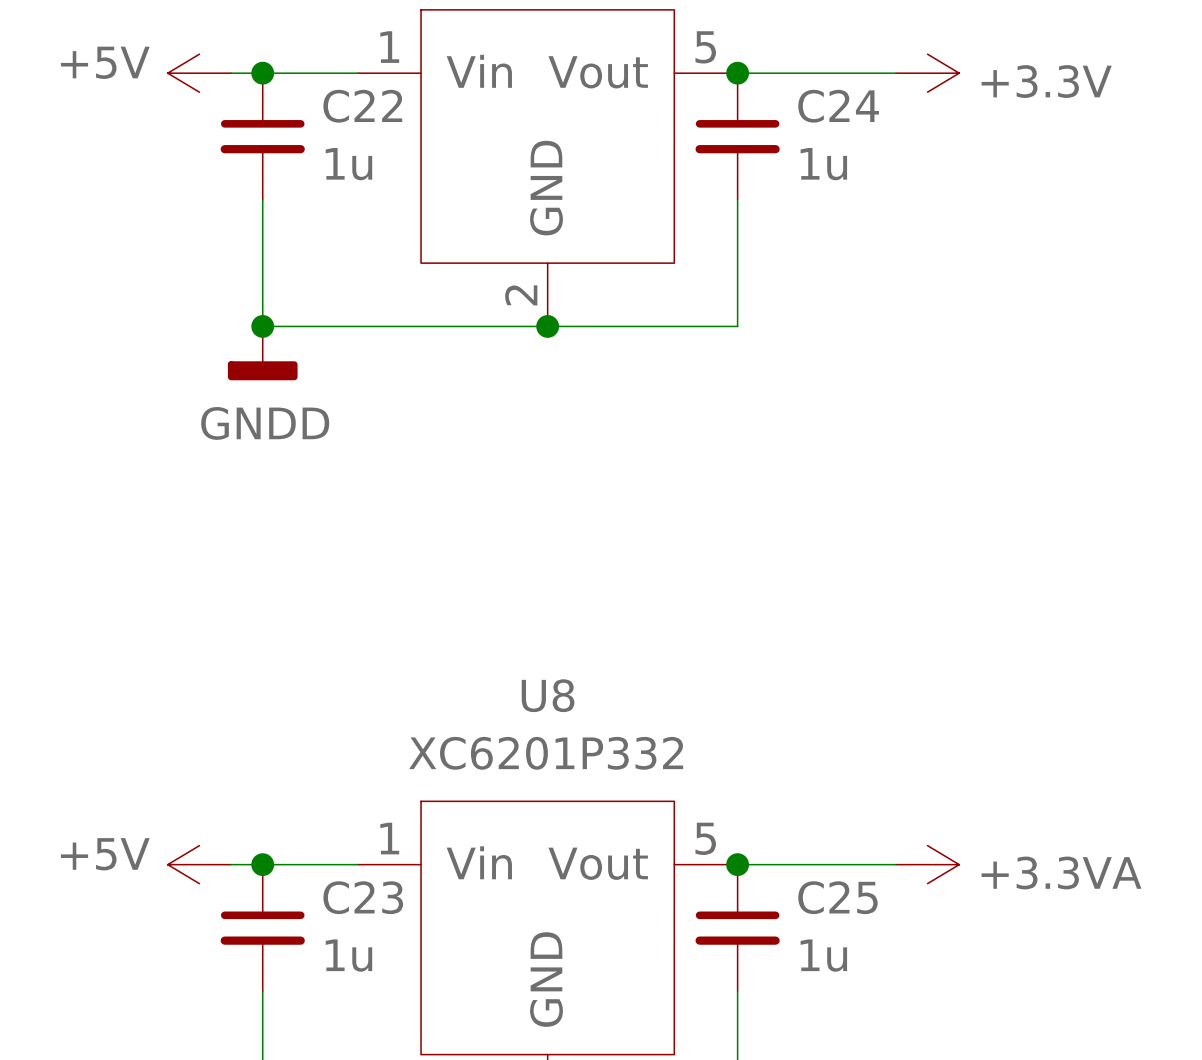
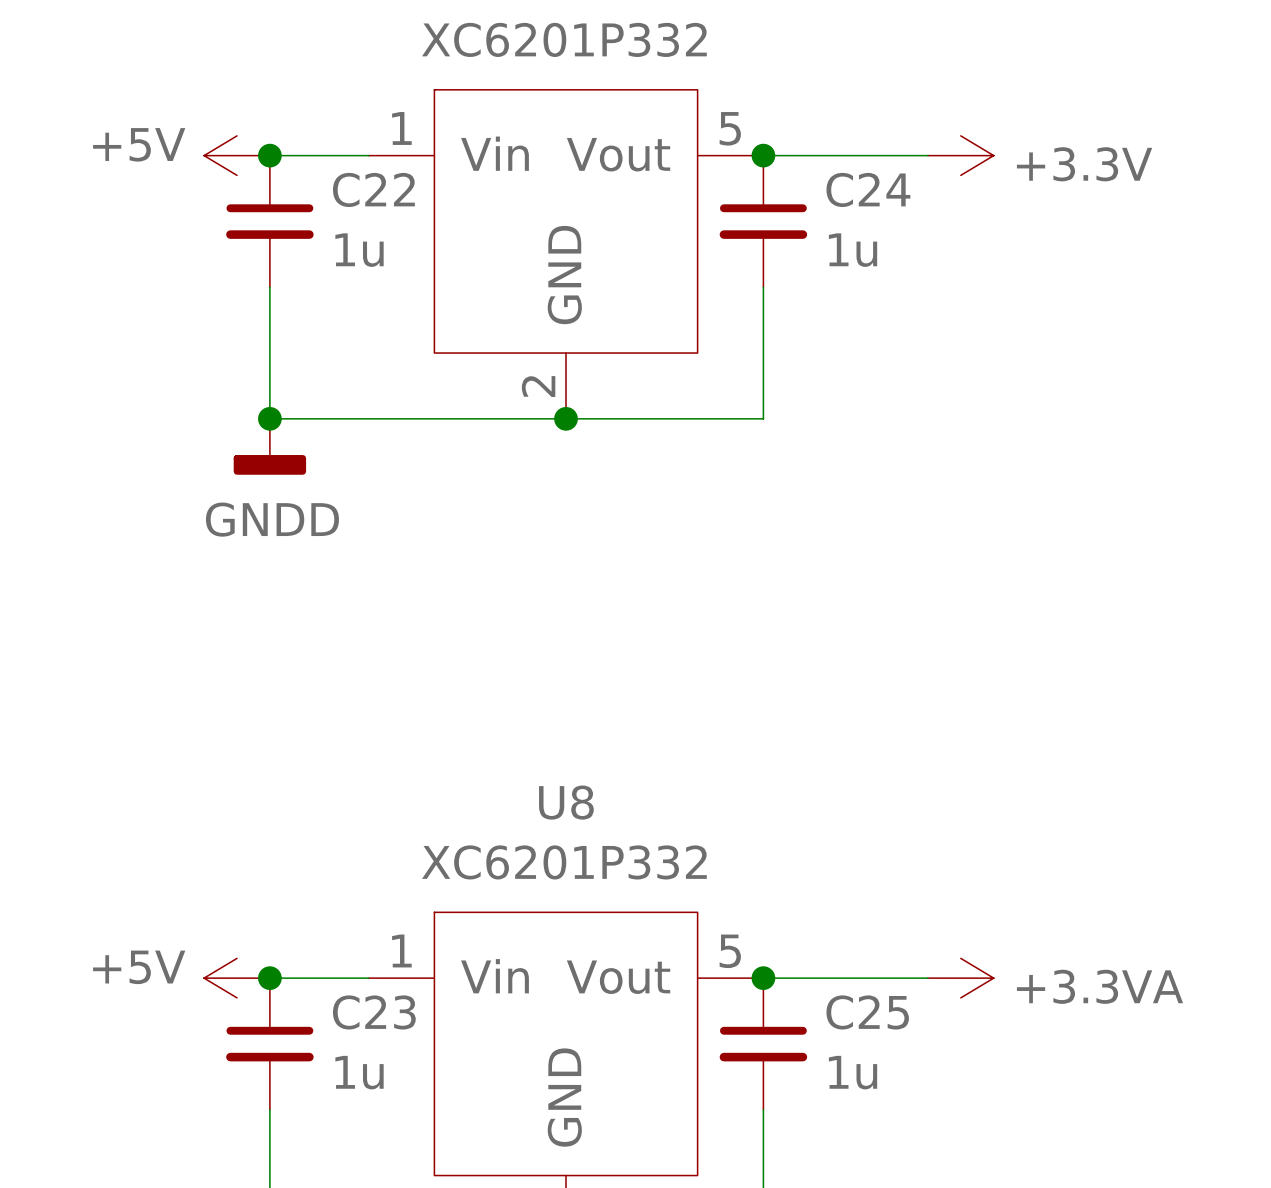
power symbol position: +5V (199, 73) -> +5V (237, 155)
power symbol position: +5V (199, 864) -> +5V (237, 978)

